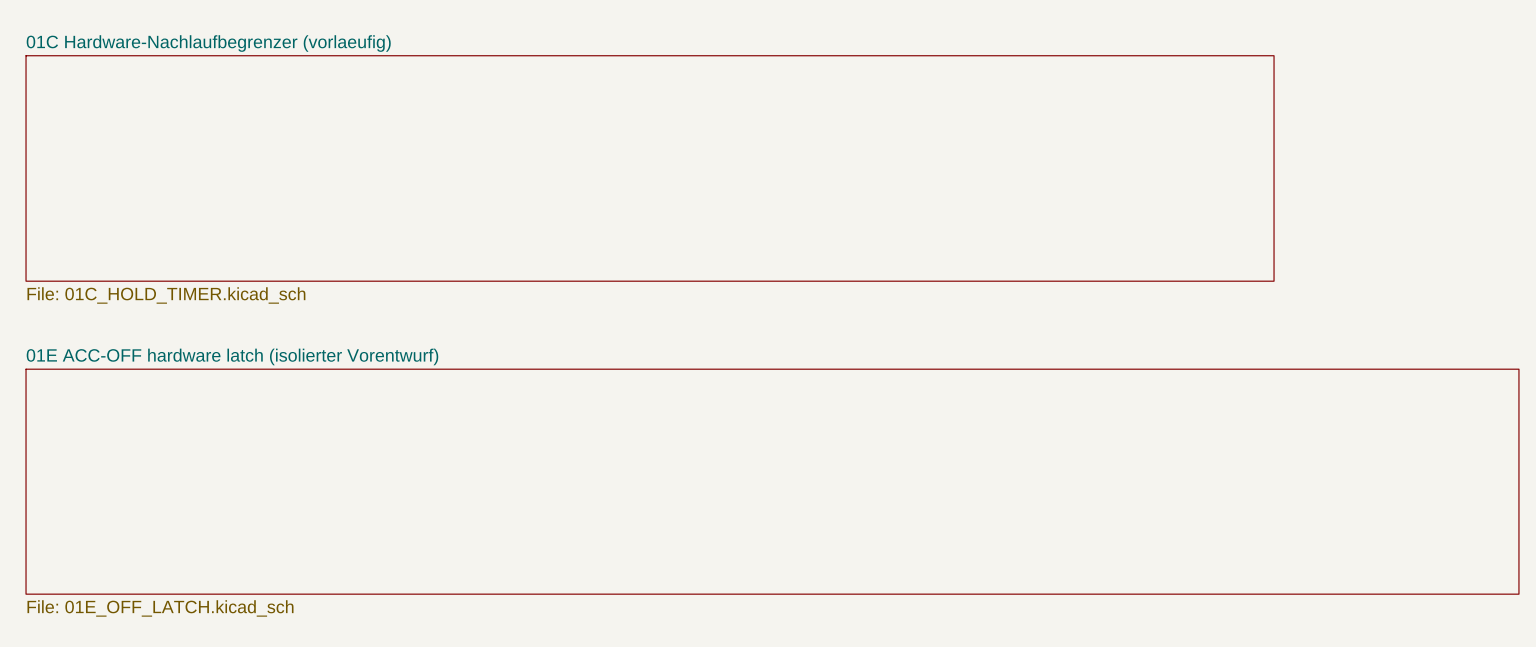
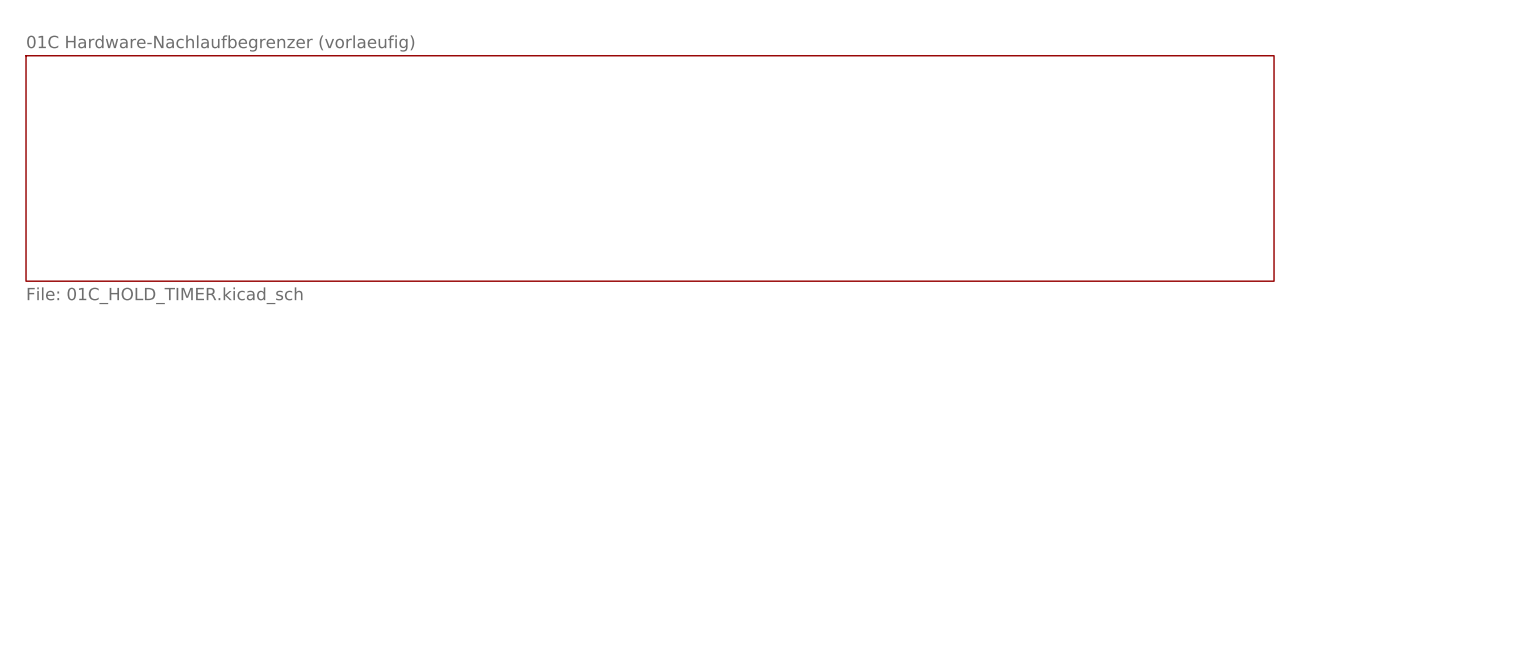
sheet 01E ACC-OFF hardware latch (isolierter Vorentwurf): File: 01E_OFF_LATCH.kicad_sch (772, 481) -> none

